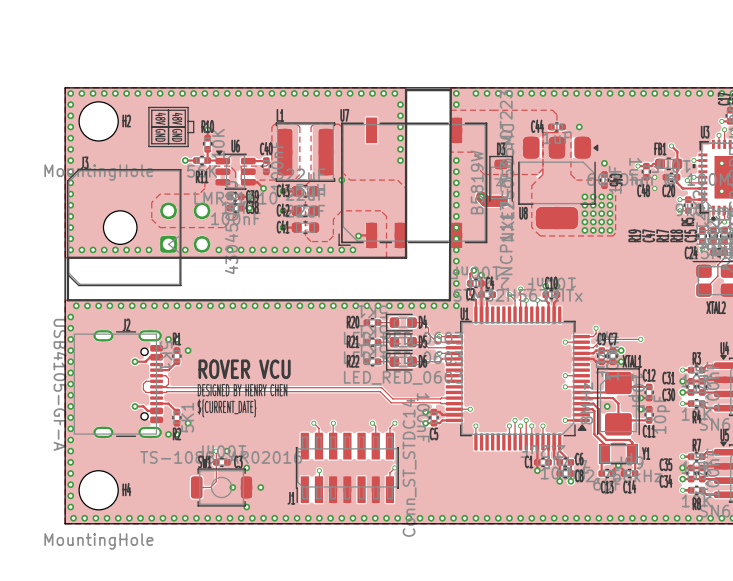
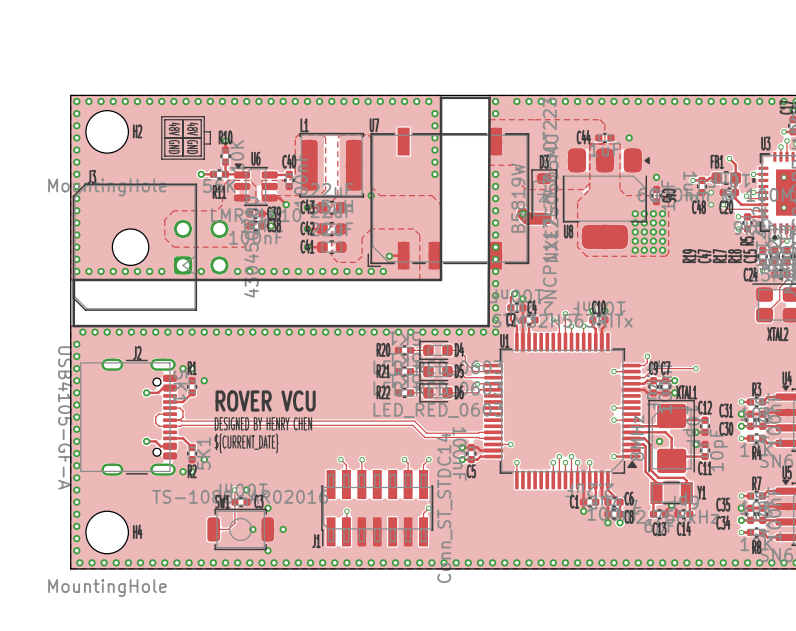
track: none -> (723, 204) (727, 209) (763, 210)
via: none -> (723, 204)

